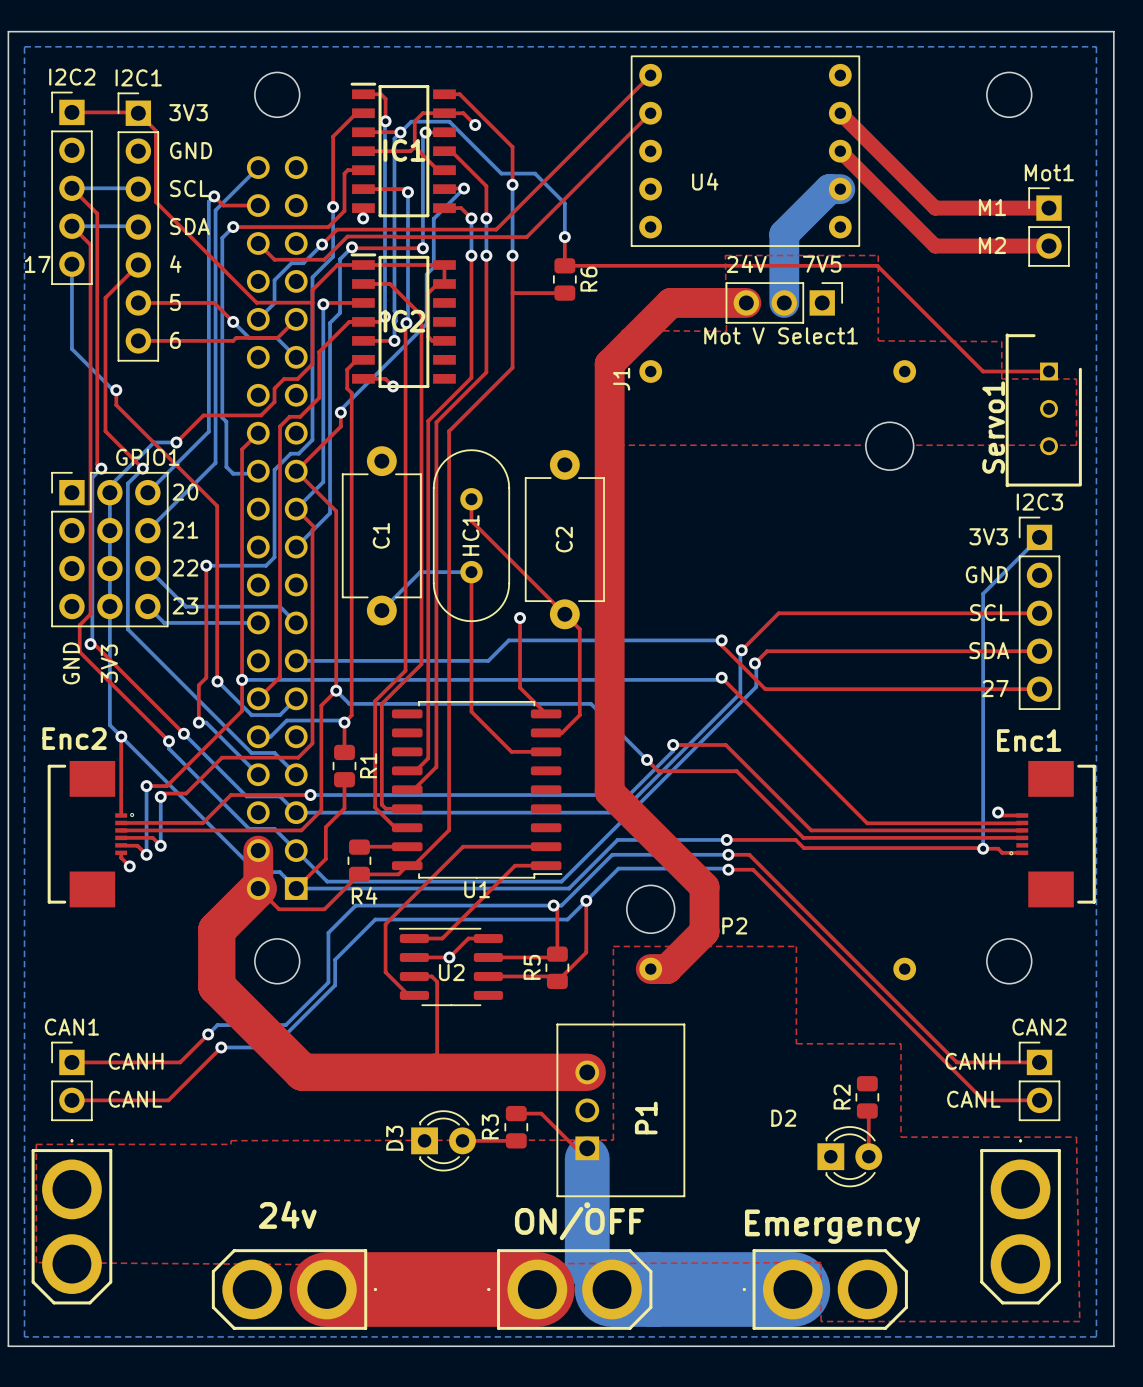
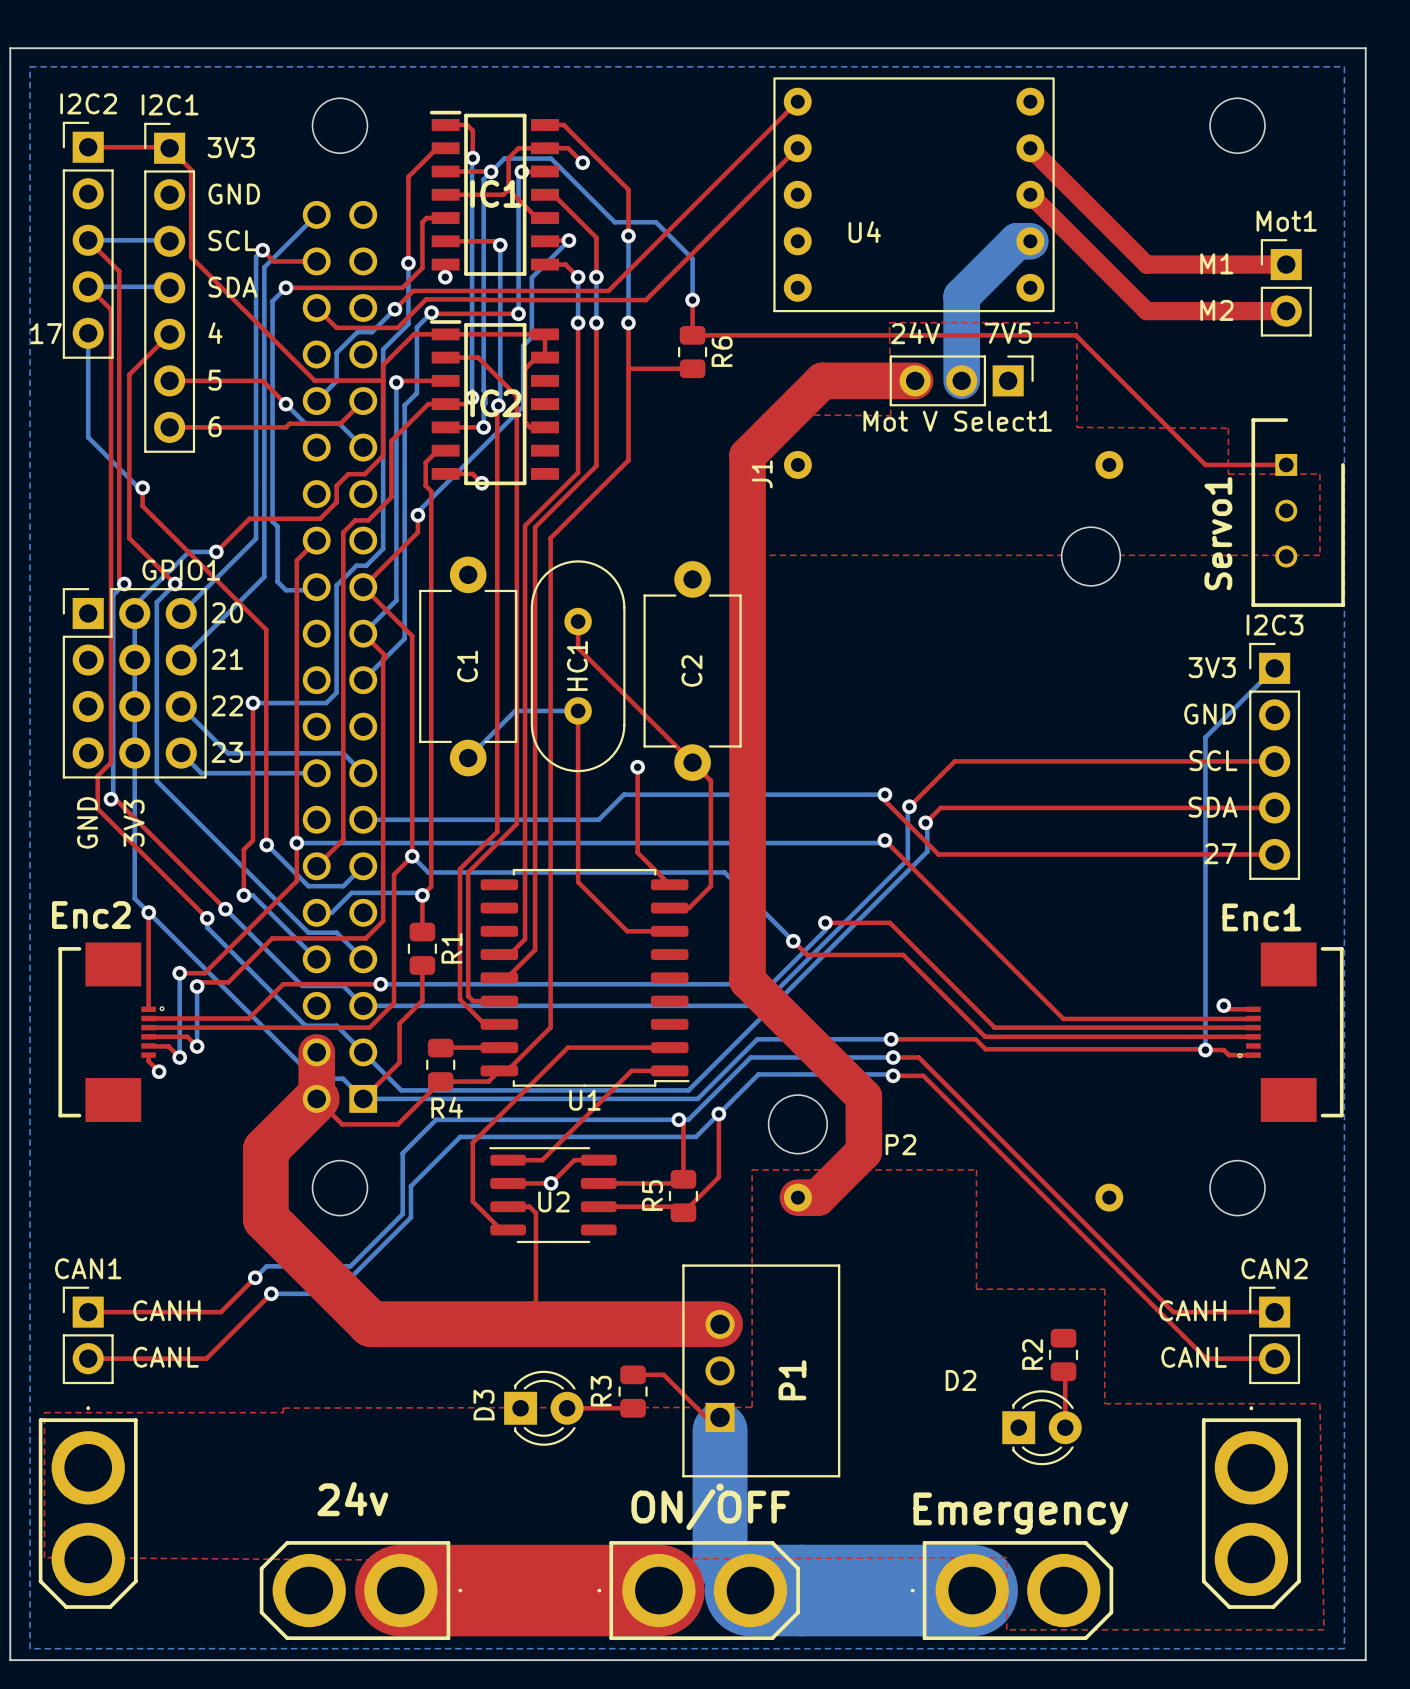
Servo1 footprint: [1005, 333, 1082, 488] -> [1251, 418, 1345, 607]

